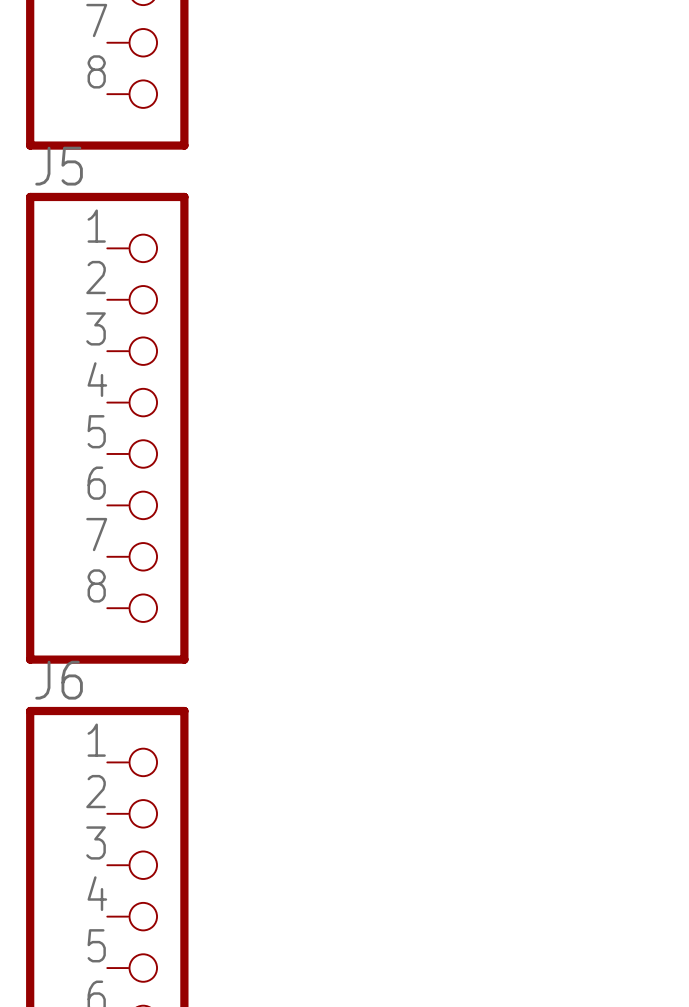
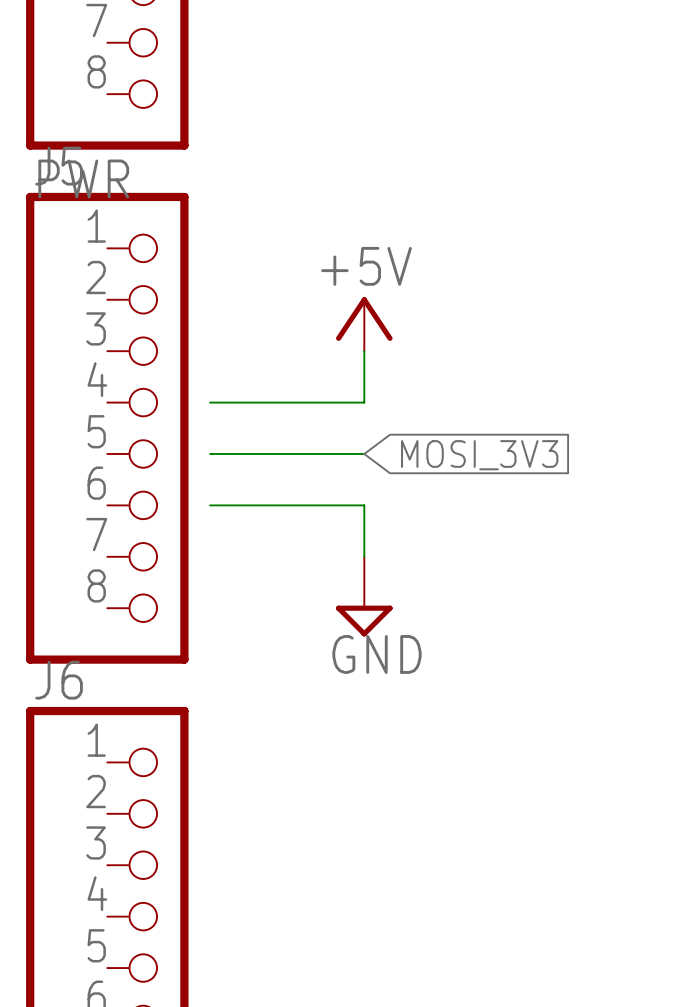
part value: none -> PWR (83, 178)
power symbol: none -> +5V (364, 324)
wire: none -> (364, 351) (364, 402) (210, 402)
wire: none -> (210, 453) (364, 453)
global label: none -> MOSI_3V3 (479, 455)
wire: none -> (210, 505) (364, 505) (364, 556)
power symbol: none -> GND (364, 596)

